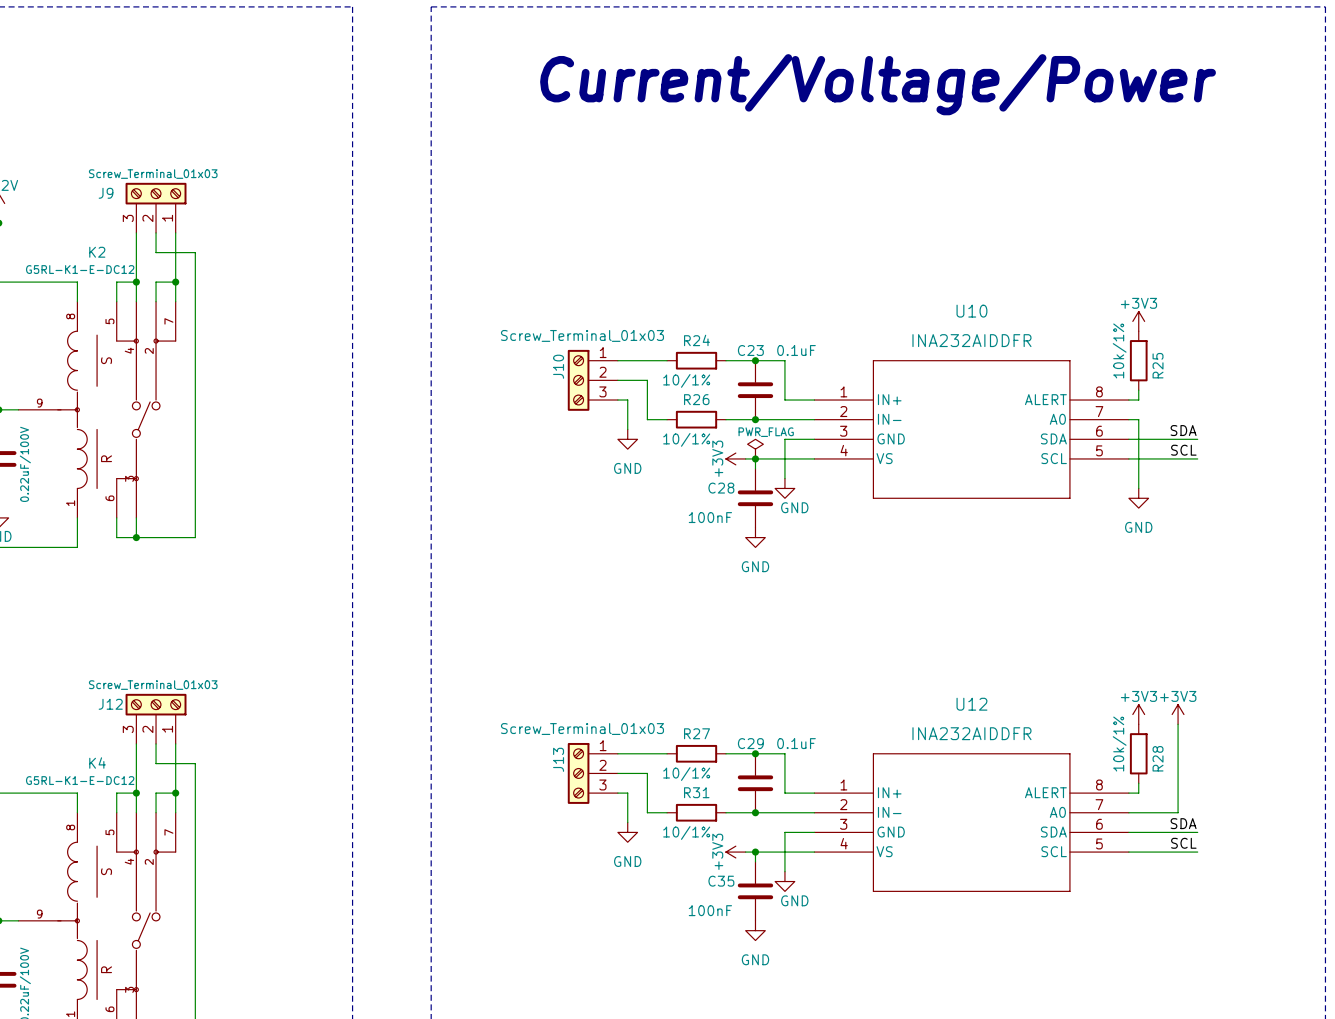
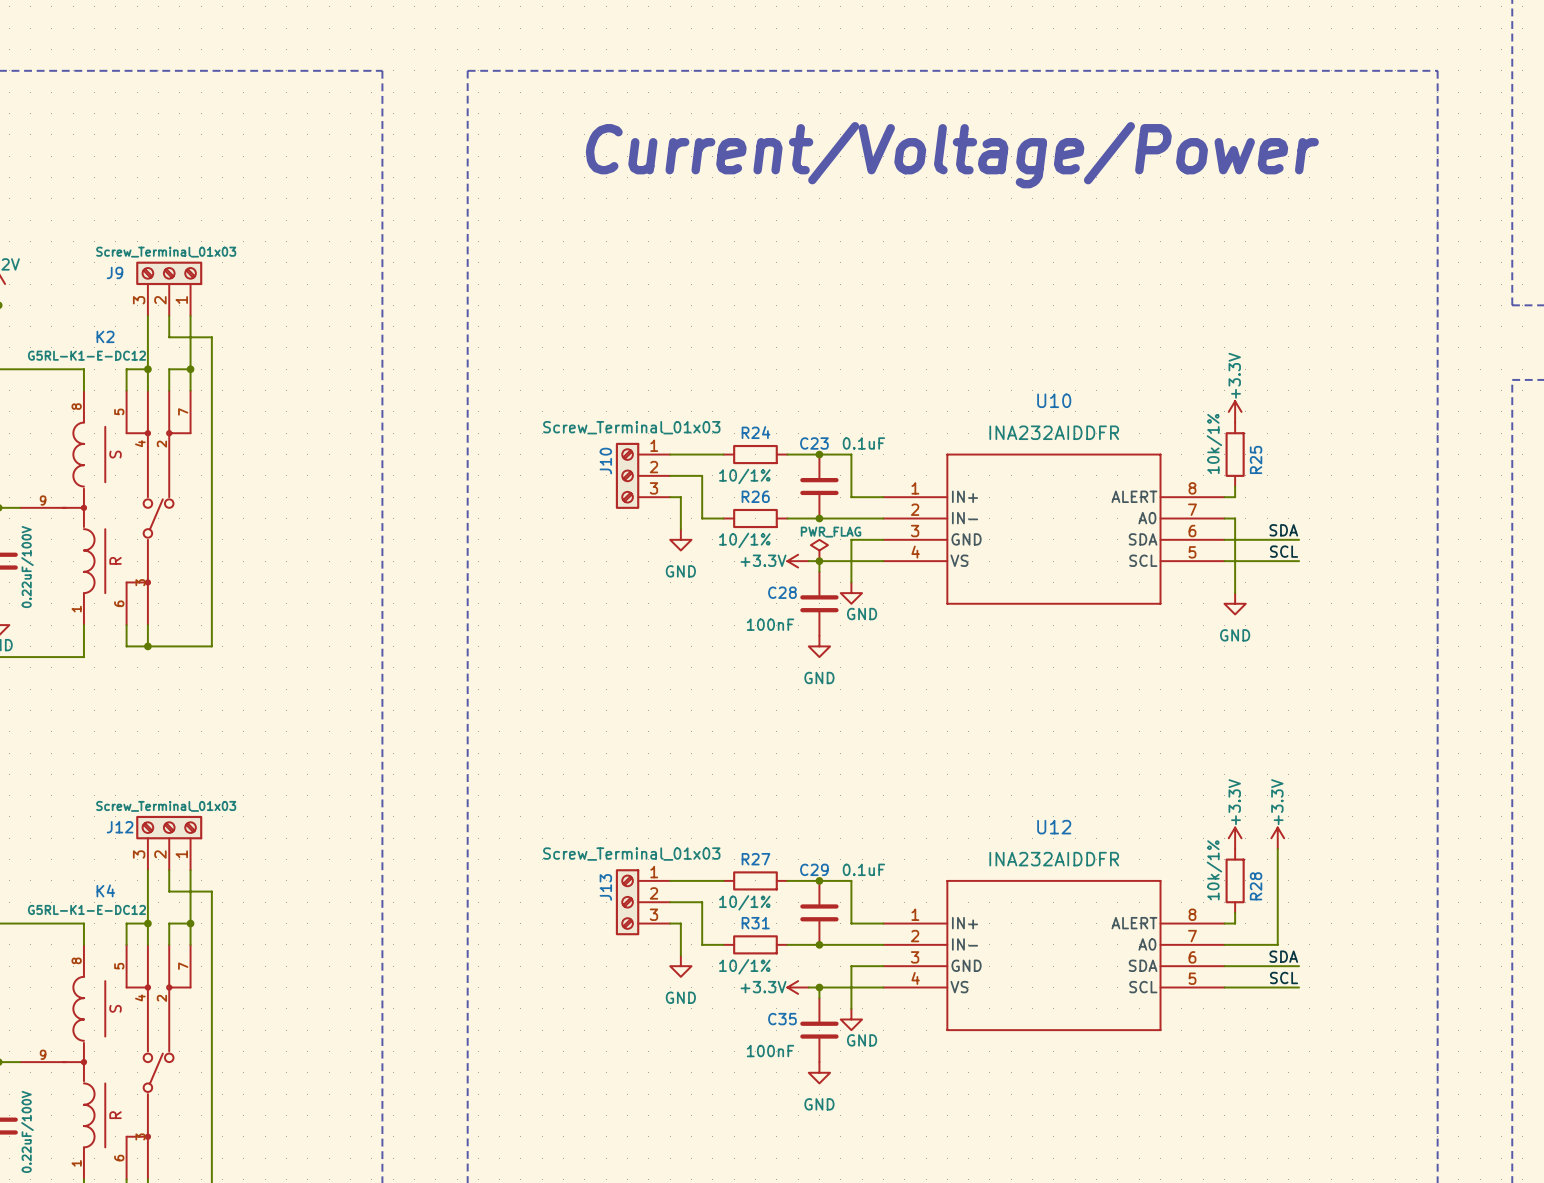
power symbol: +3V3 (1138, 321) -> +3.3V (1235, 411)
power symbol: +3V3 (735, 458) -> +3.3V (798, 561)
power symbol: +3V3 (1138, 714) -> +3.3V (1235, 838)
power symbol: +3V3 (1178, 714) -> +3.3V (1277, 838)
power symbol: +3V3 (735, 852) -> +3.3V (798, 987)

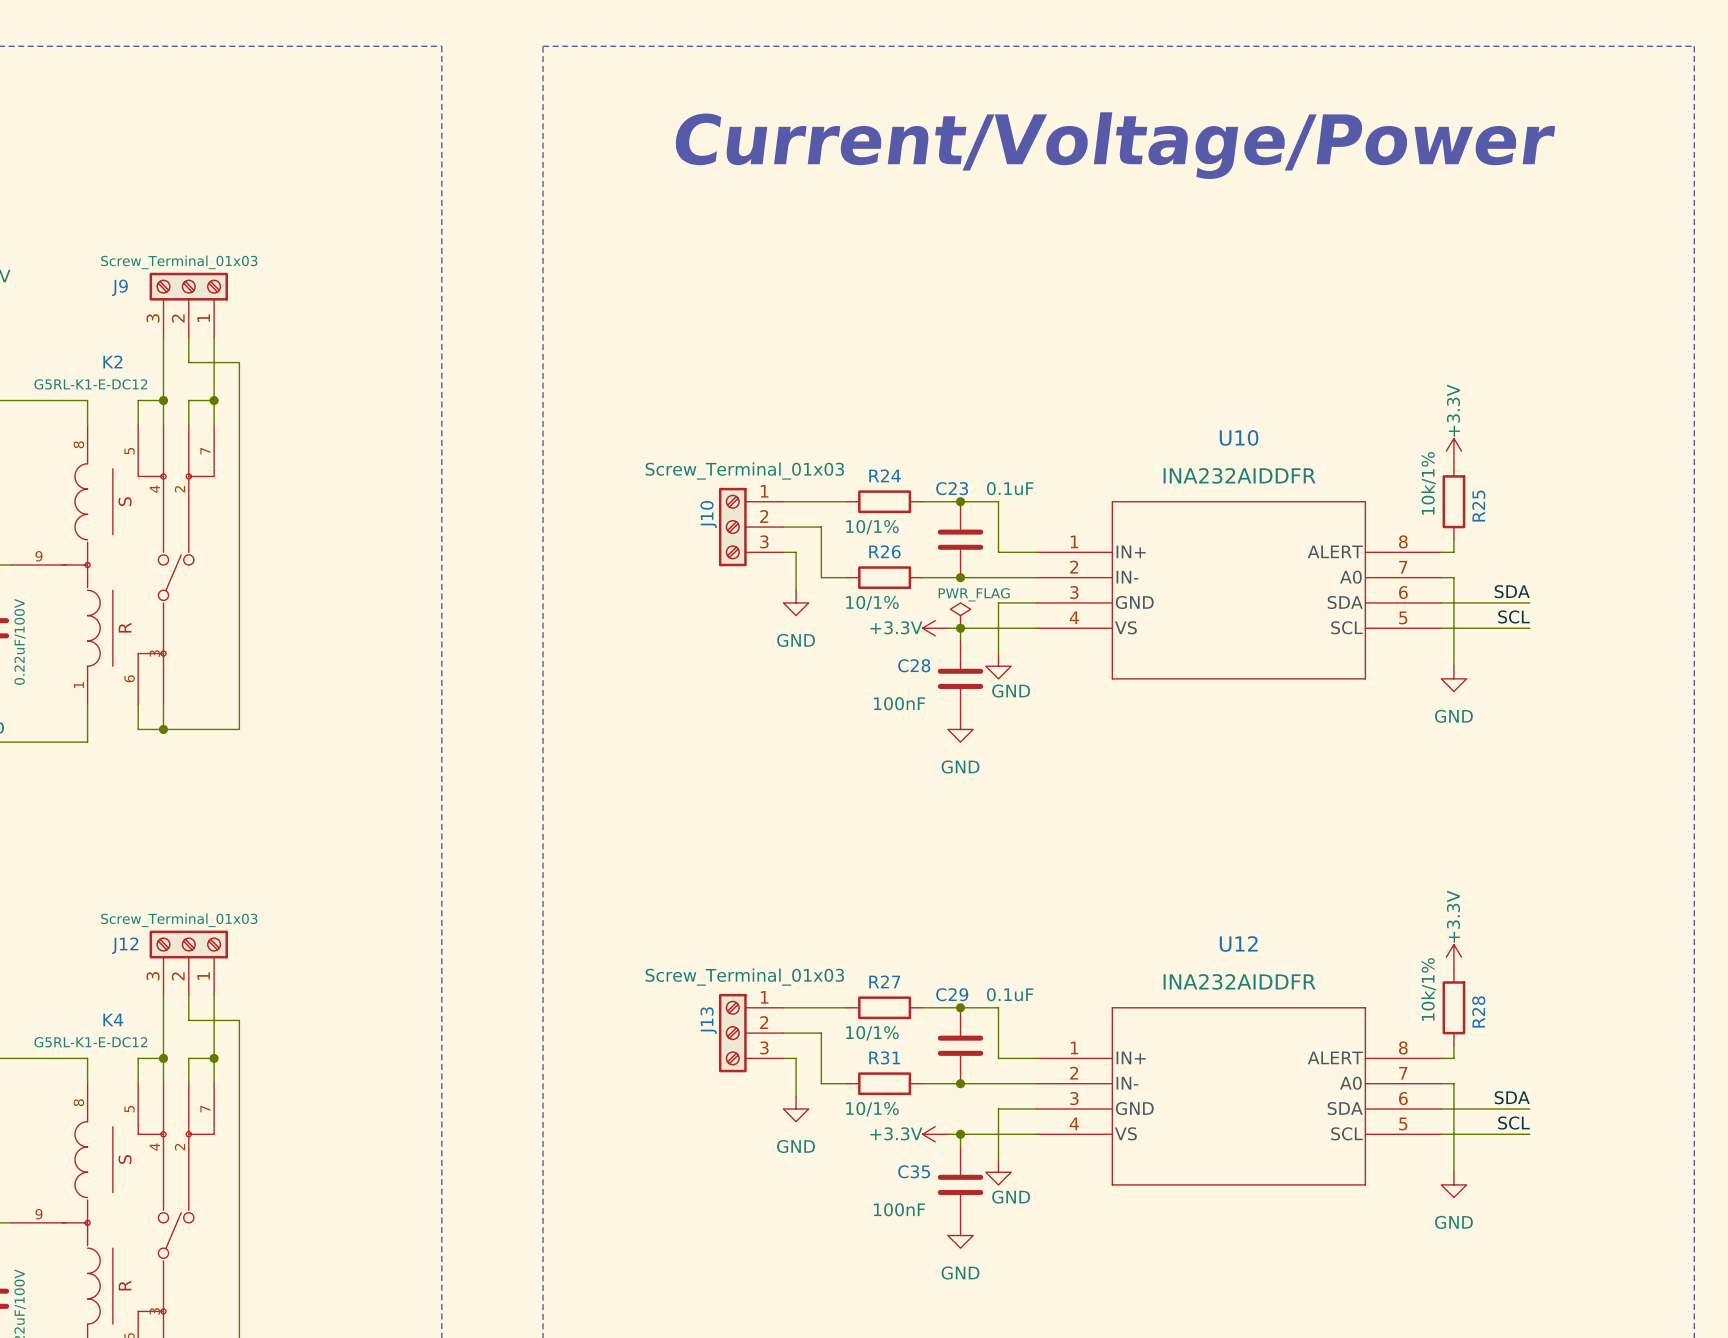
power symbol: +3.3V (1277, 838) -> none
wire: (1277, 848) (1277, 944) (1235, 944) -> (1453, 1172) (1453, 1083)
power symbol: none -> GND (1453, 1184)

